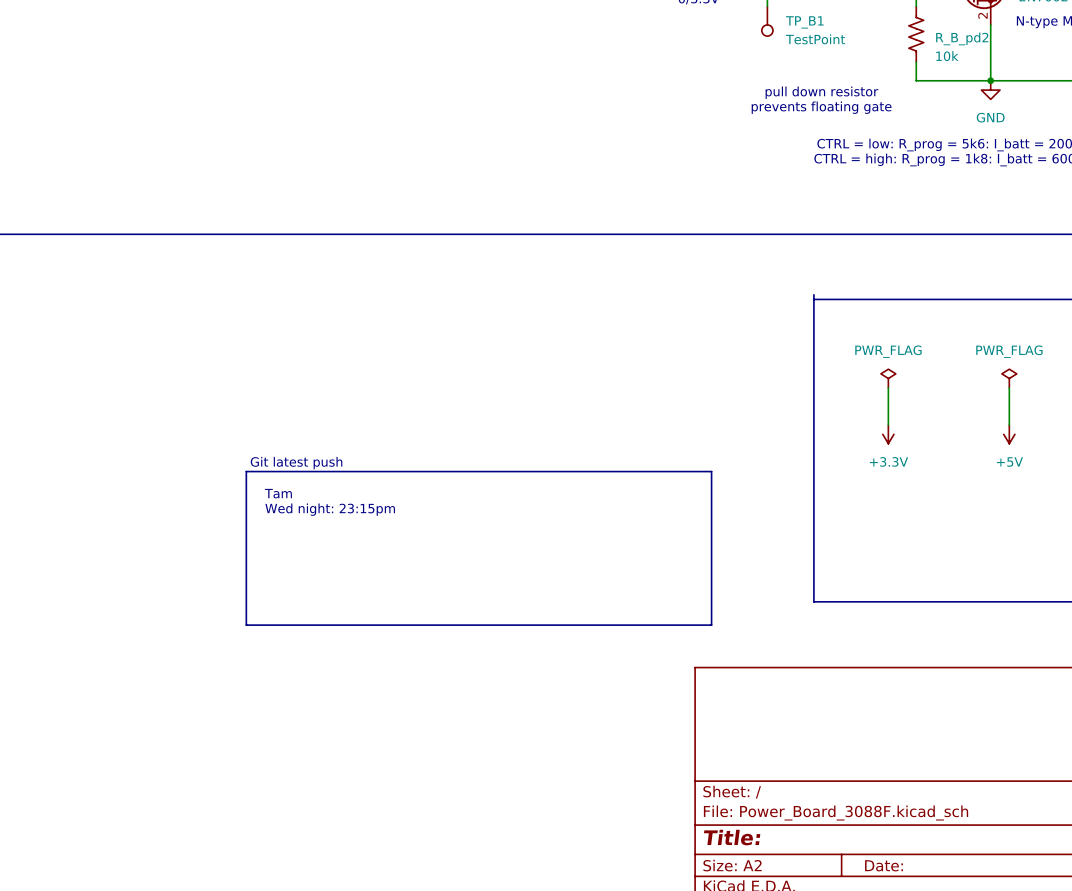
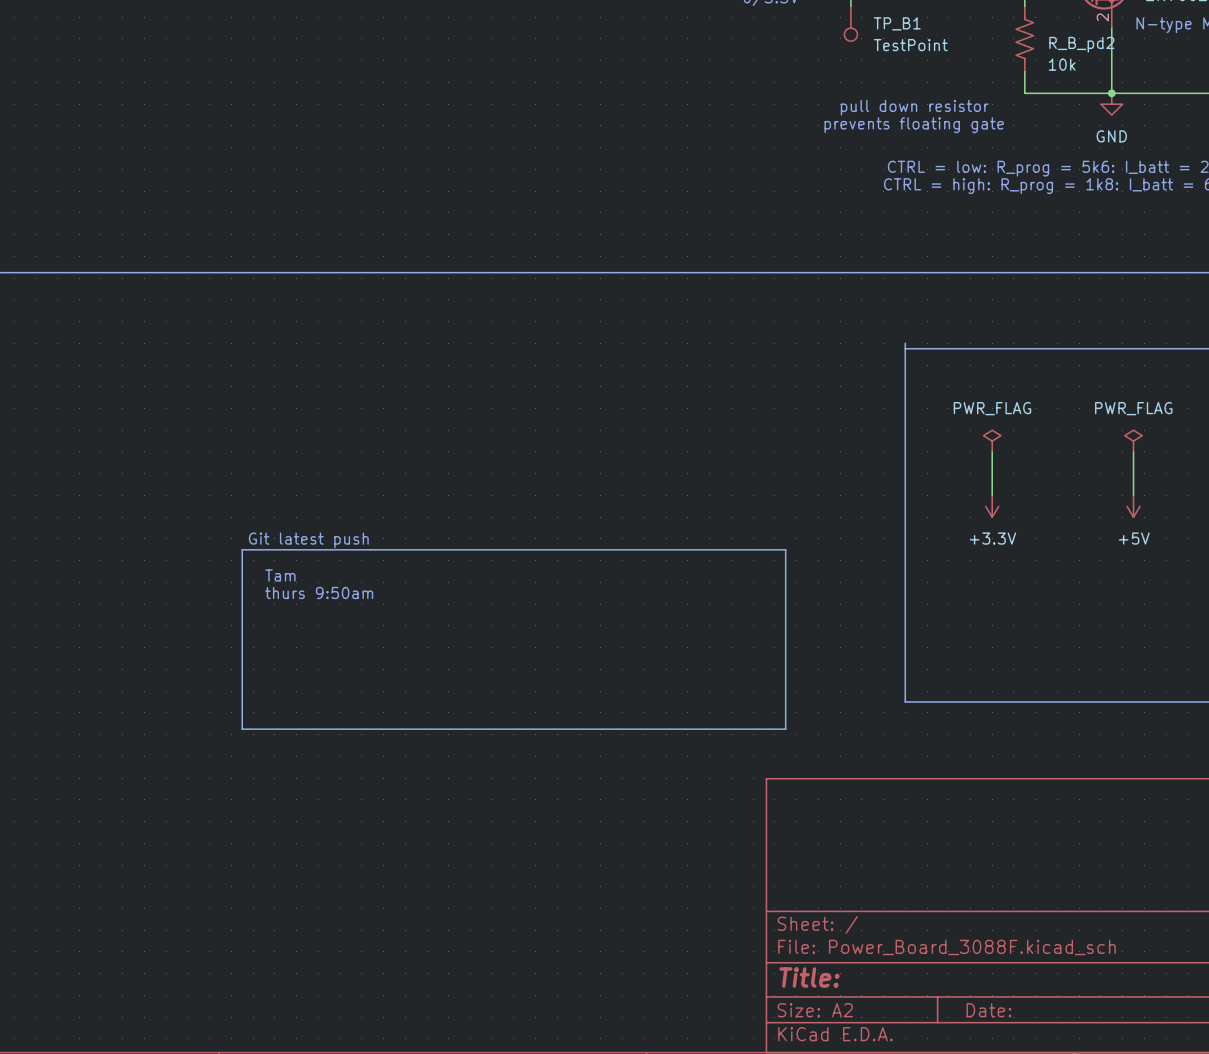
text: Wed night: 23:15pm (330, 509) -> thurs 9:50am (319, 592)

